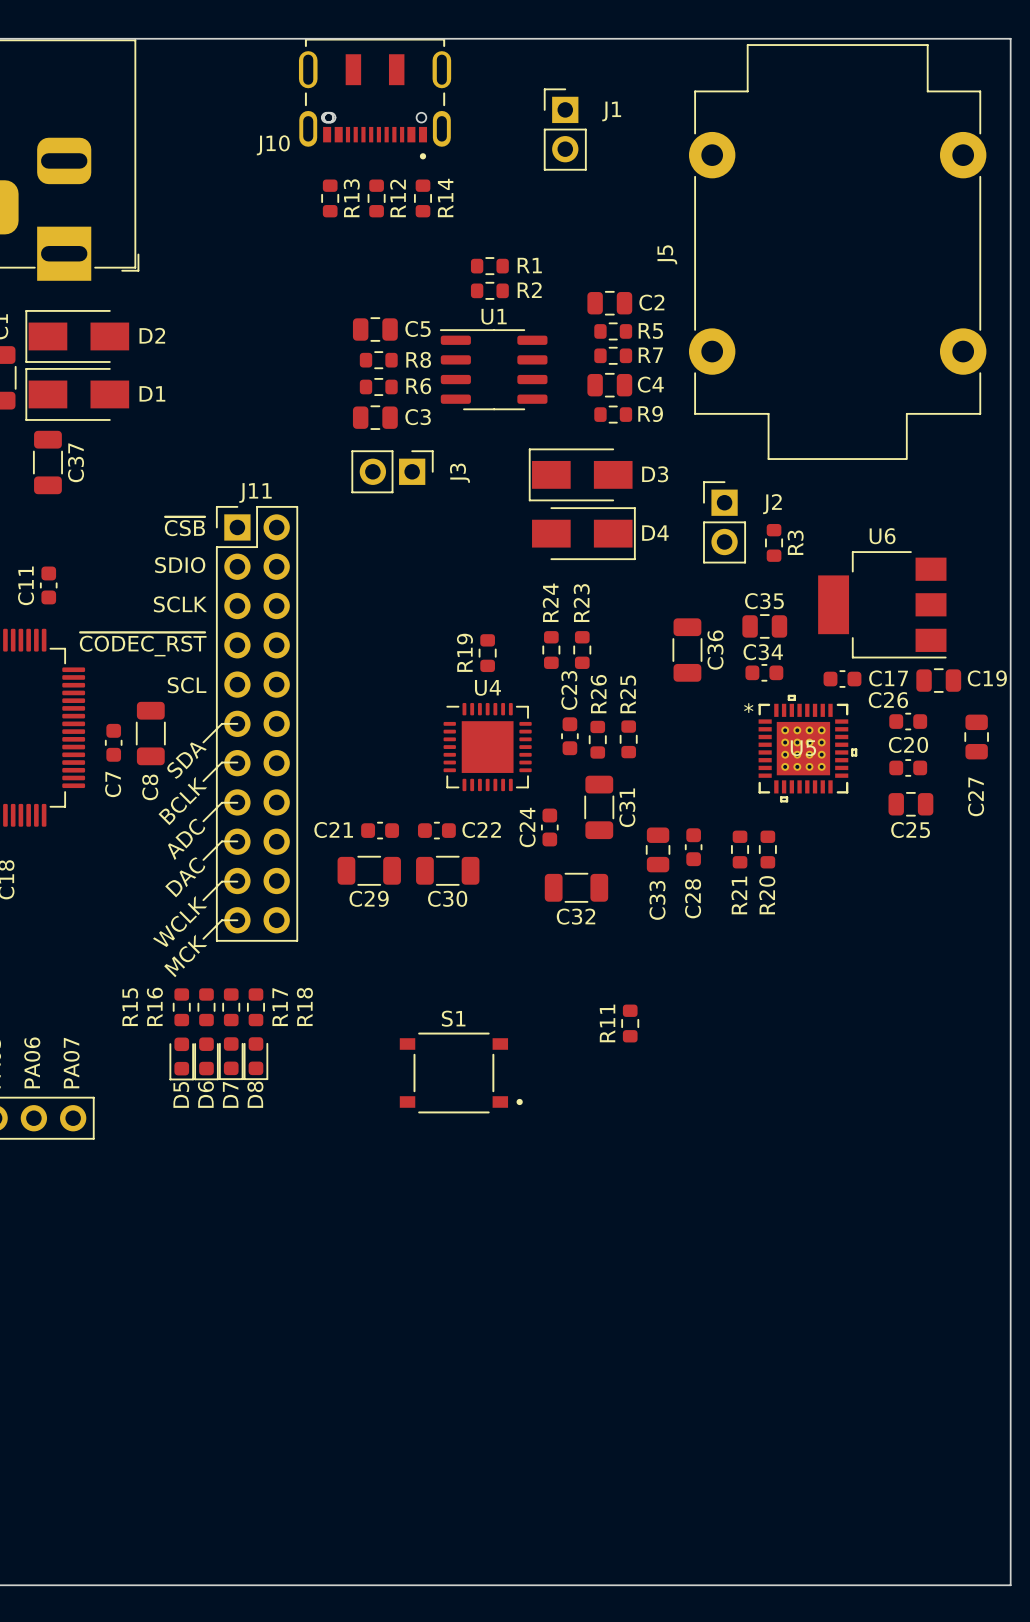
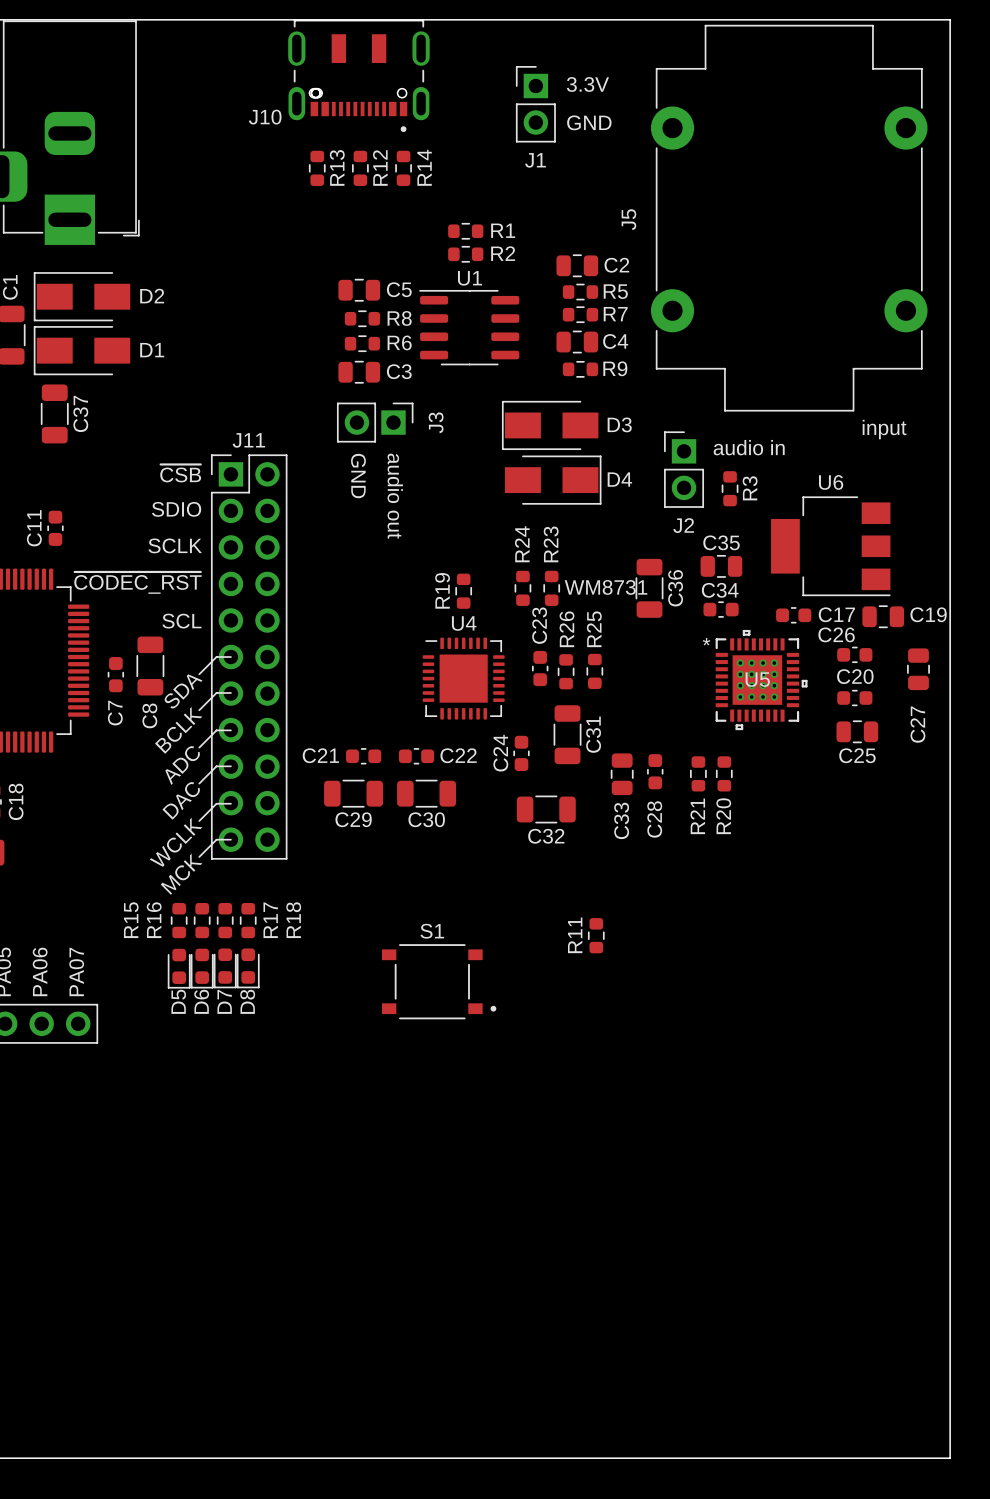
text: none -> 3.3V (587, 84)
J1 name position: J1 (611, 111) -> J1 (535, 160)
text: none -> GND (589, 122)
text: none -> input (884, 429)
text: none -> audio in (749, 447)
J2 name position: J2 (772, 504) -> J2 (683, 525)
text: none -> GND (358, 476)
text: none -> audio out (395, 496)
text: none -> WM8731 (606, 587)

